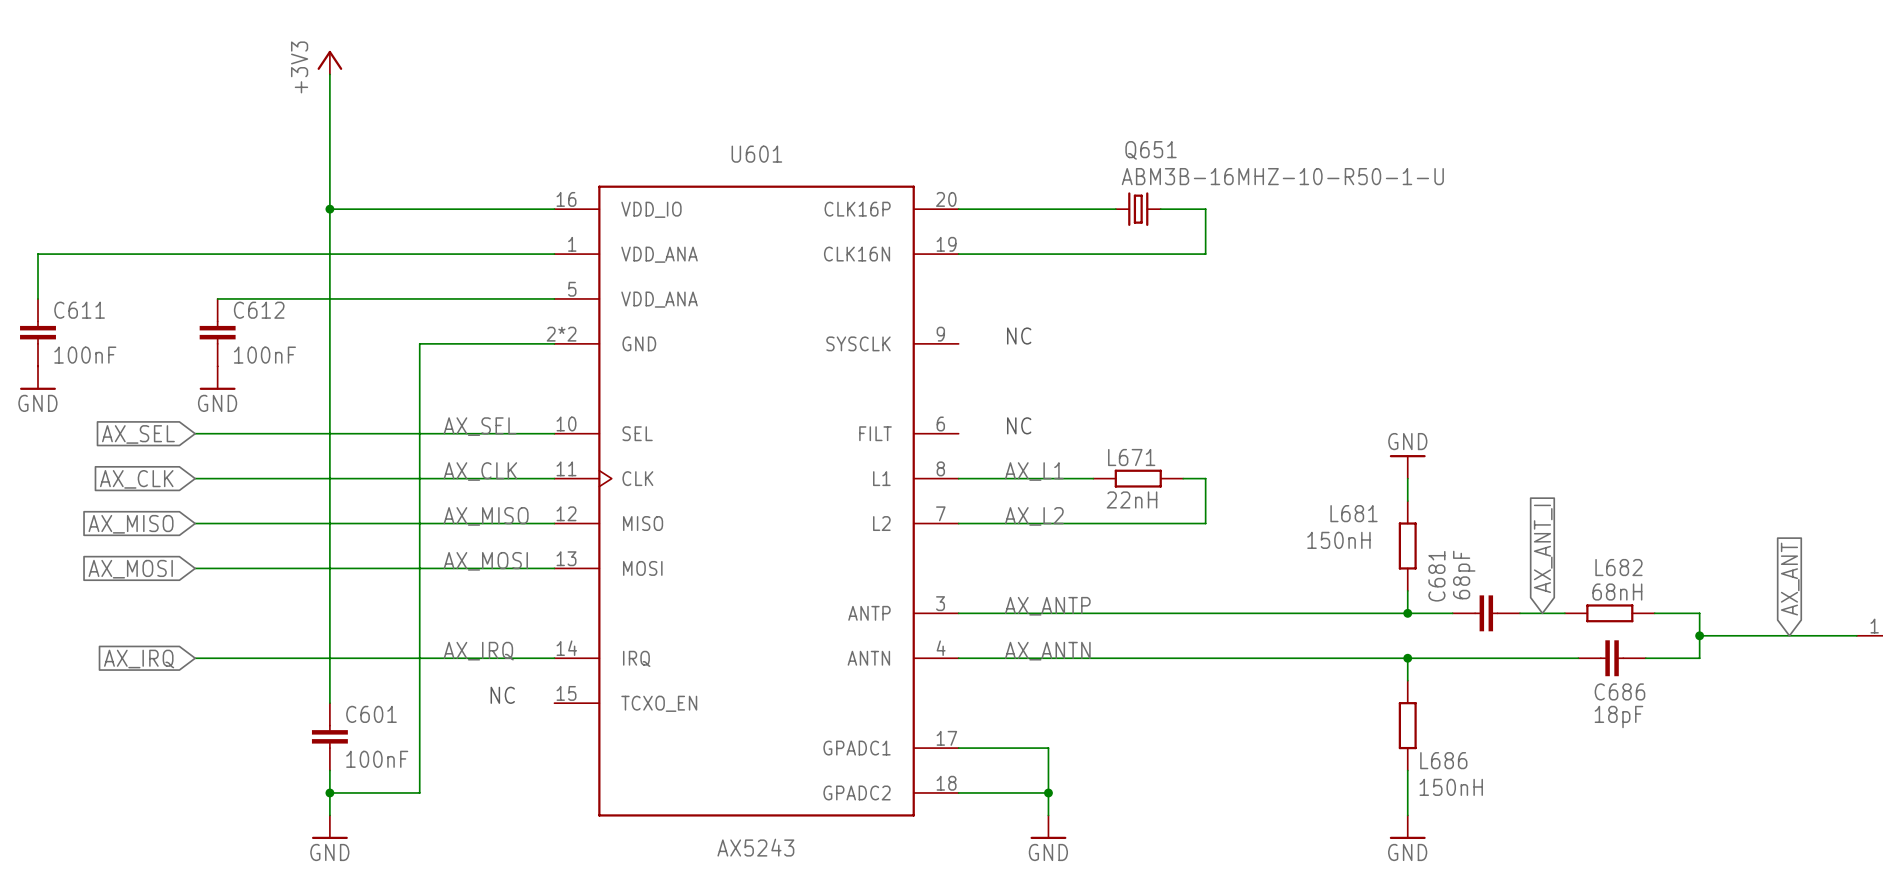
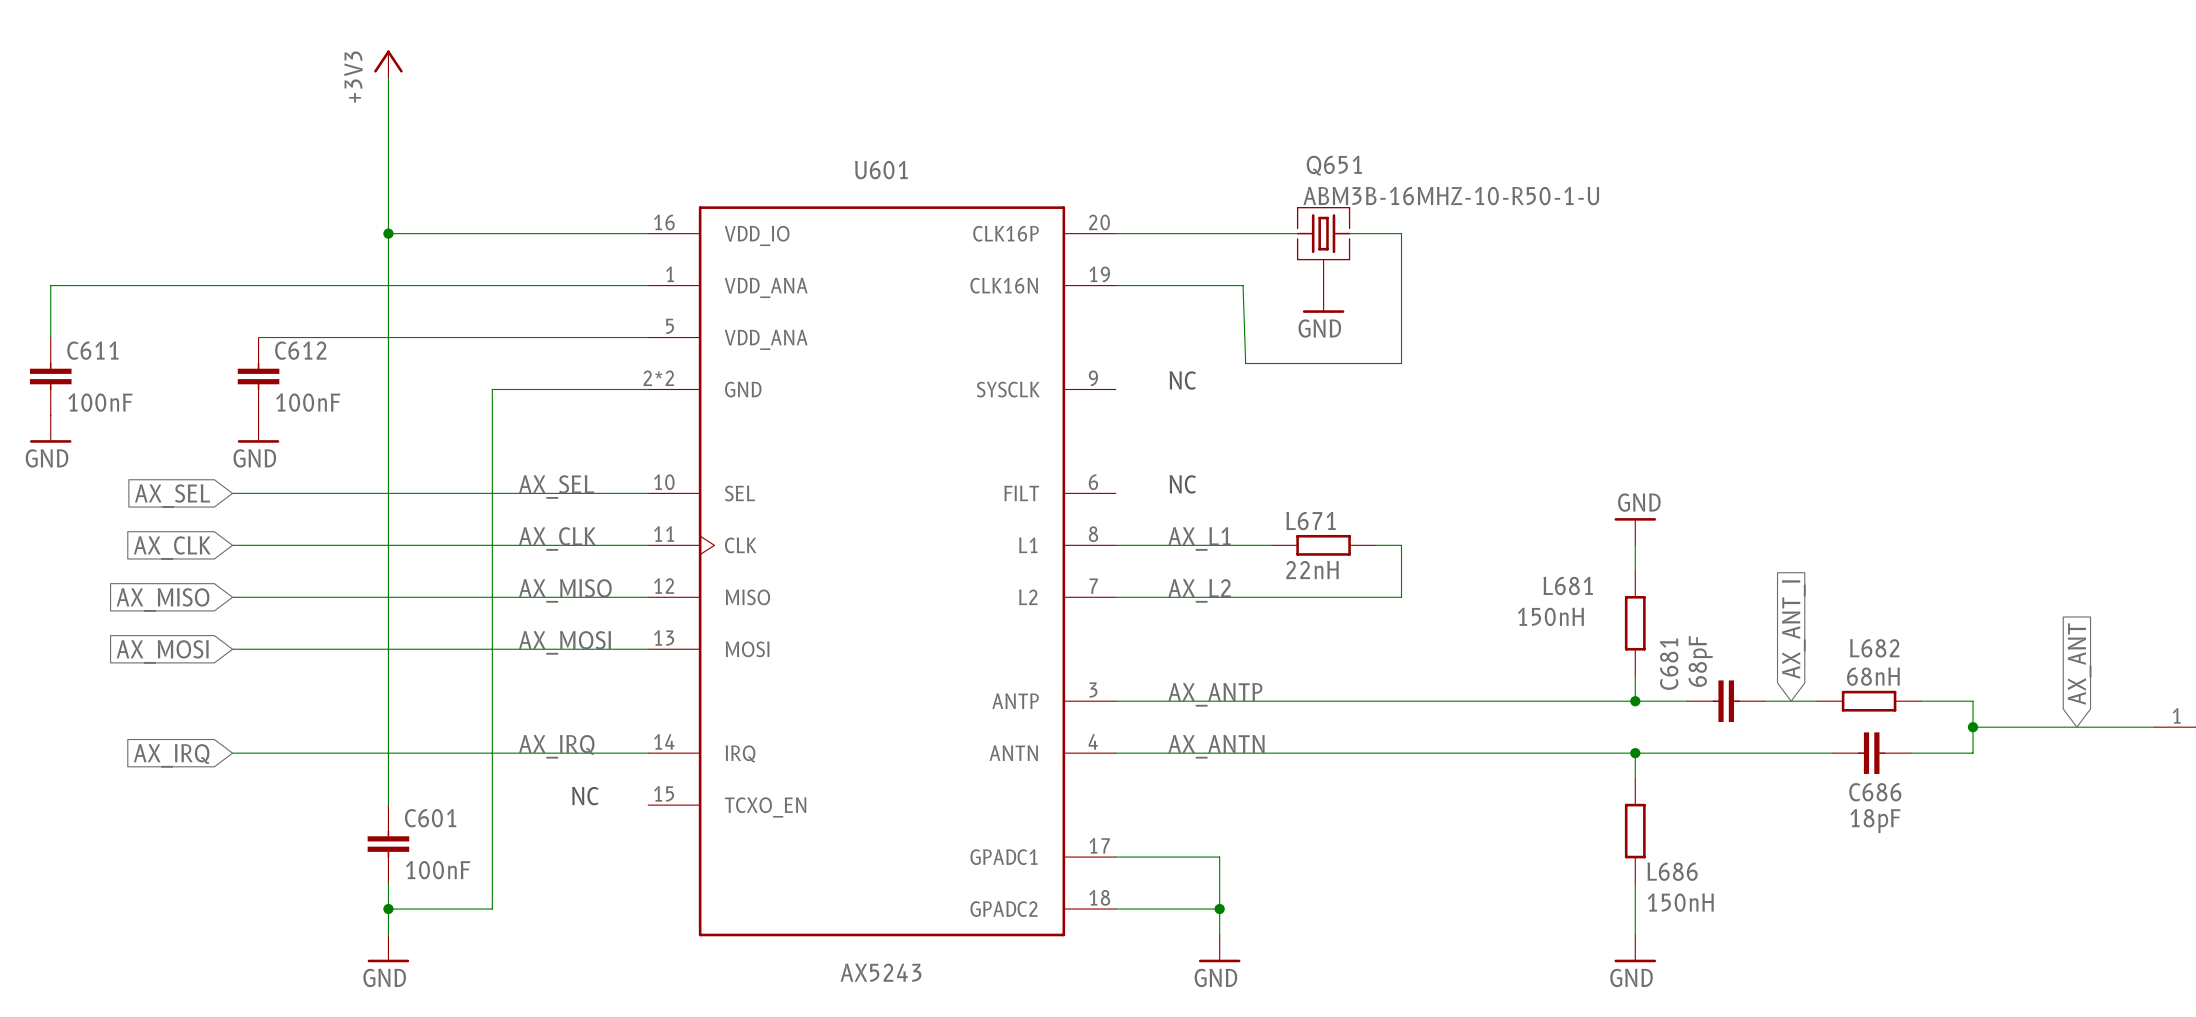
Q651 symbol: [1115, 192, 1162, 227] -> [1296, 207, 1351, 286]
wire: (1068, 254) (1205, 254) -> (1243, 285) (1245, 363) (1401, 363) (1401, 285)
power symbol: none -> GND (1323, 299)

